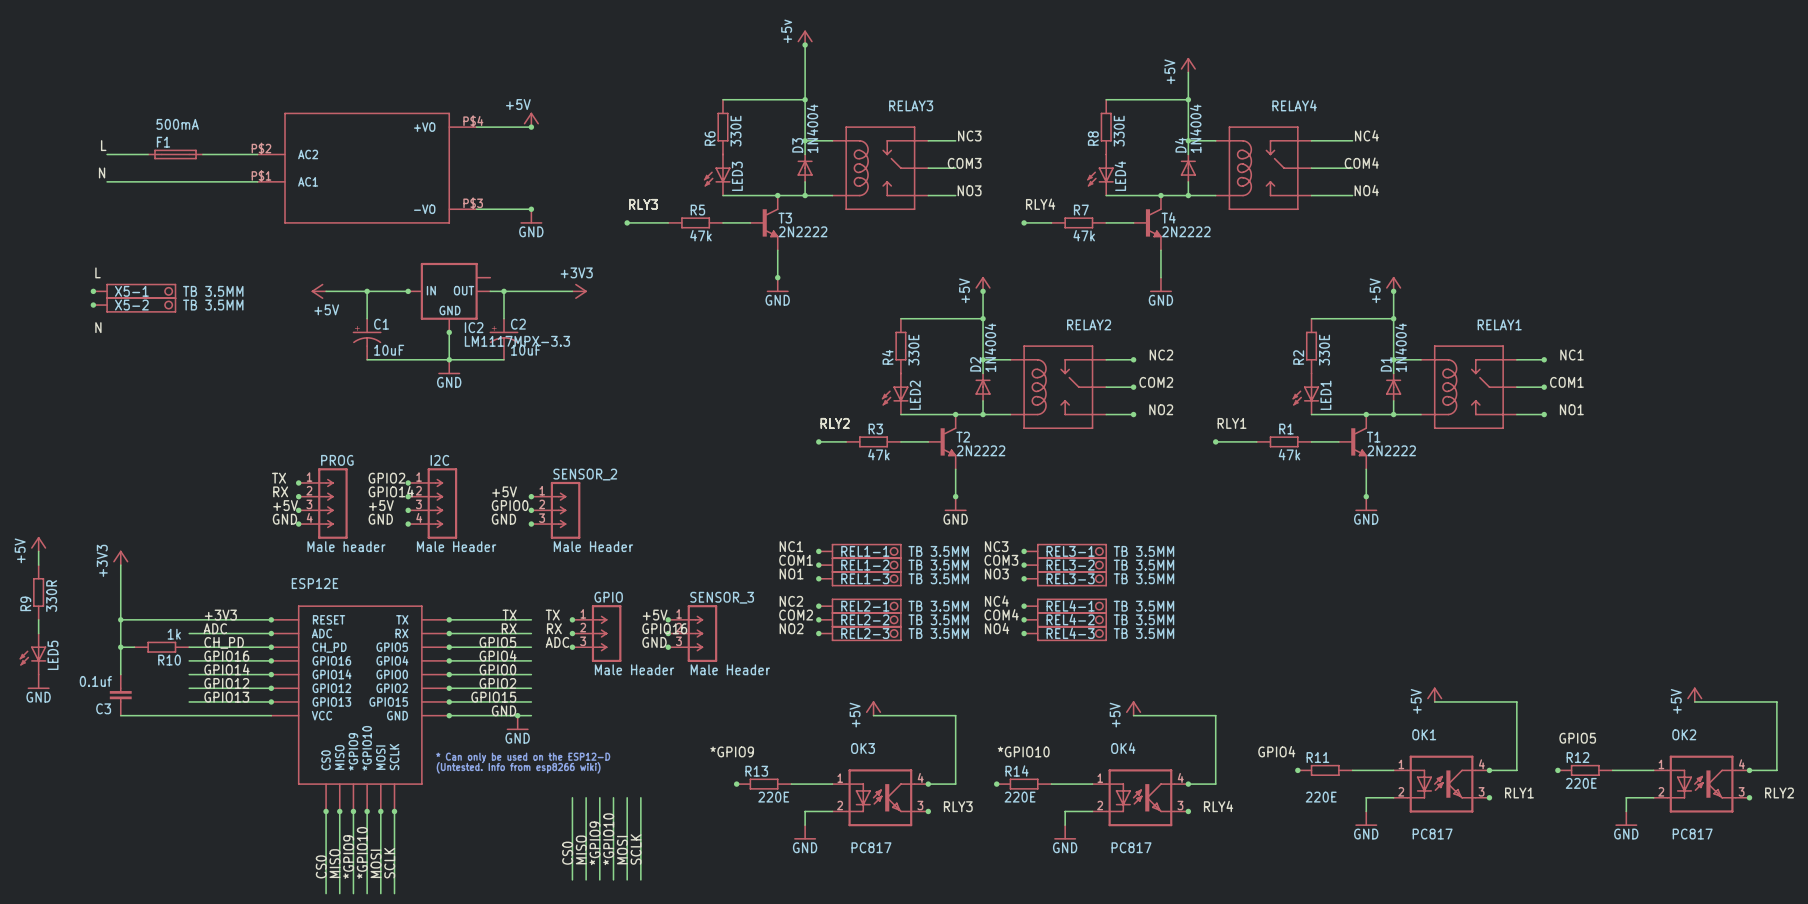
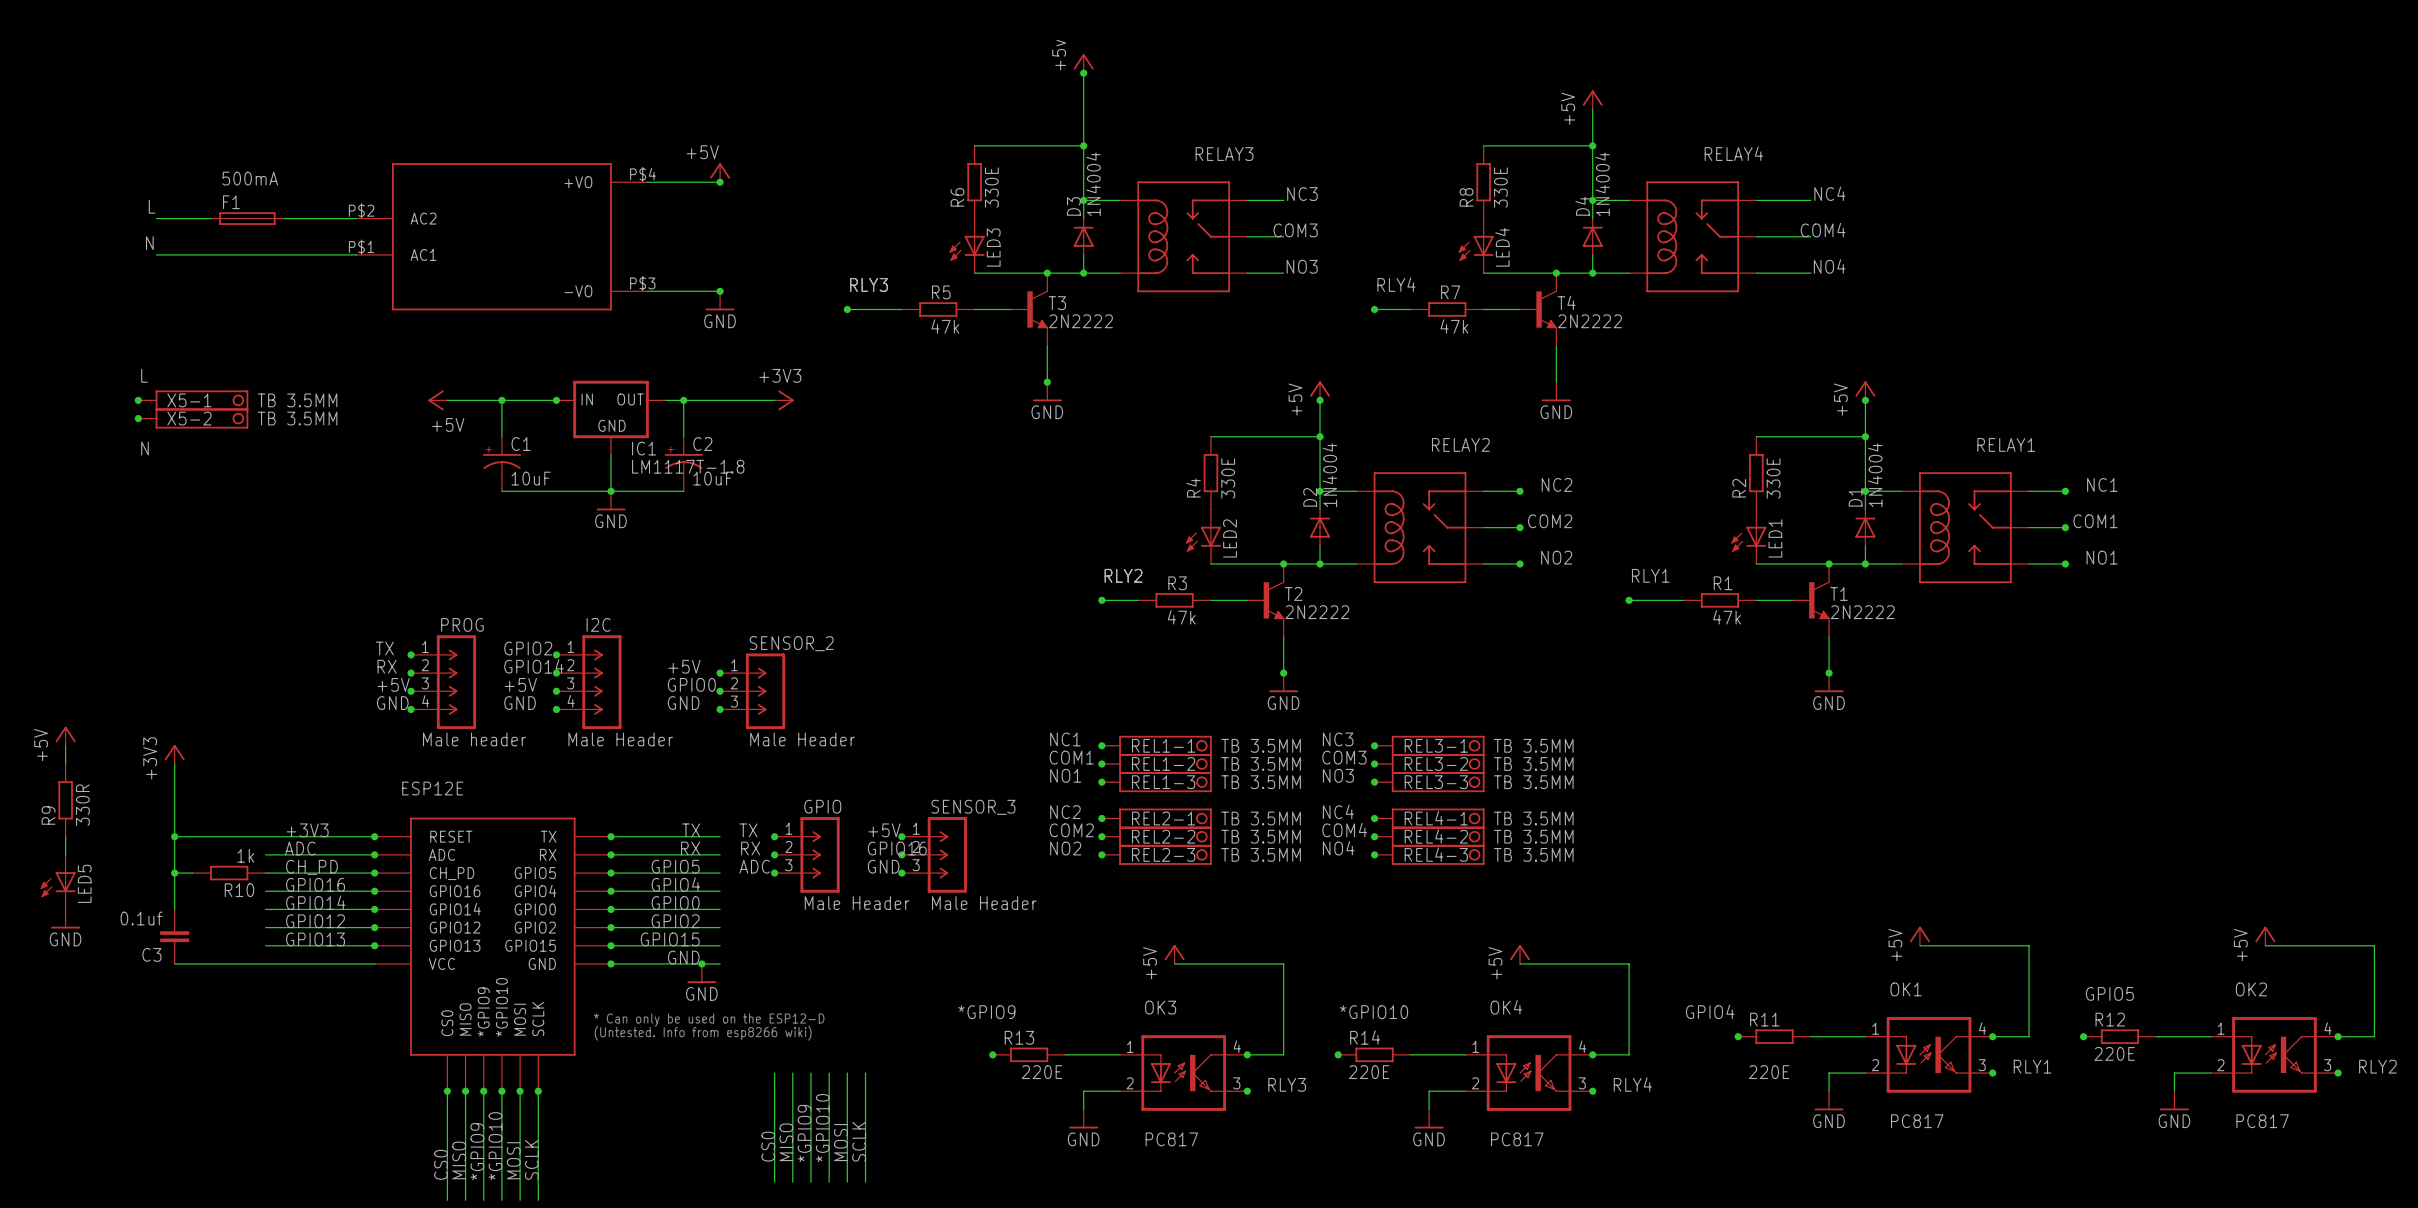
IC2: LM1117MPX-3.3 (449, 297) -> none
IC1: none -> LM1117T-1.8 (611, 417)
junction: (449, 332) -> none

